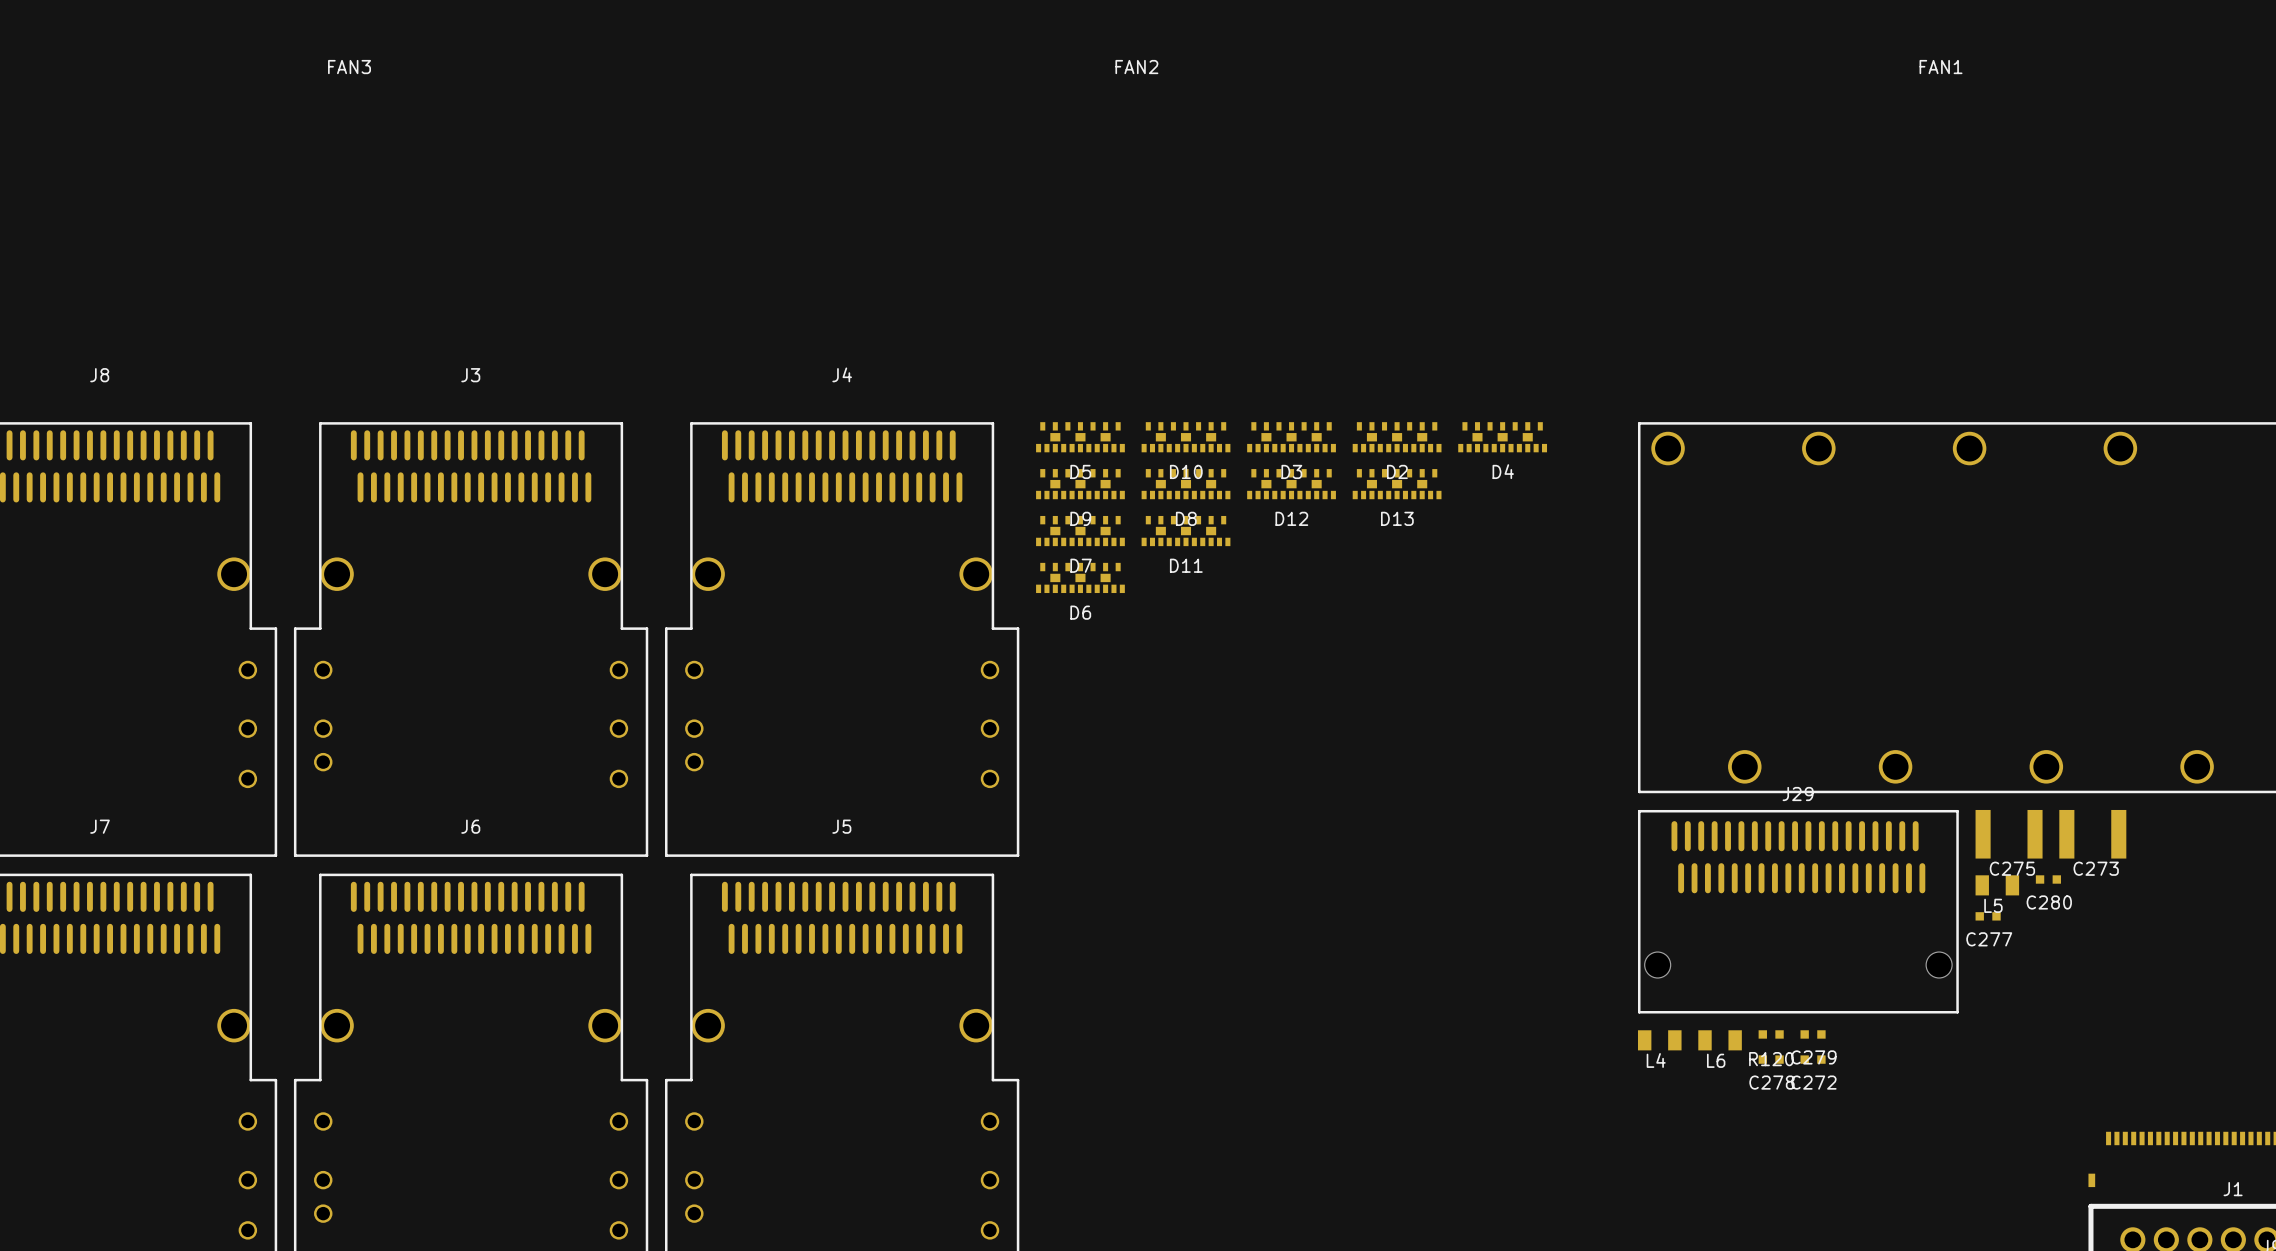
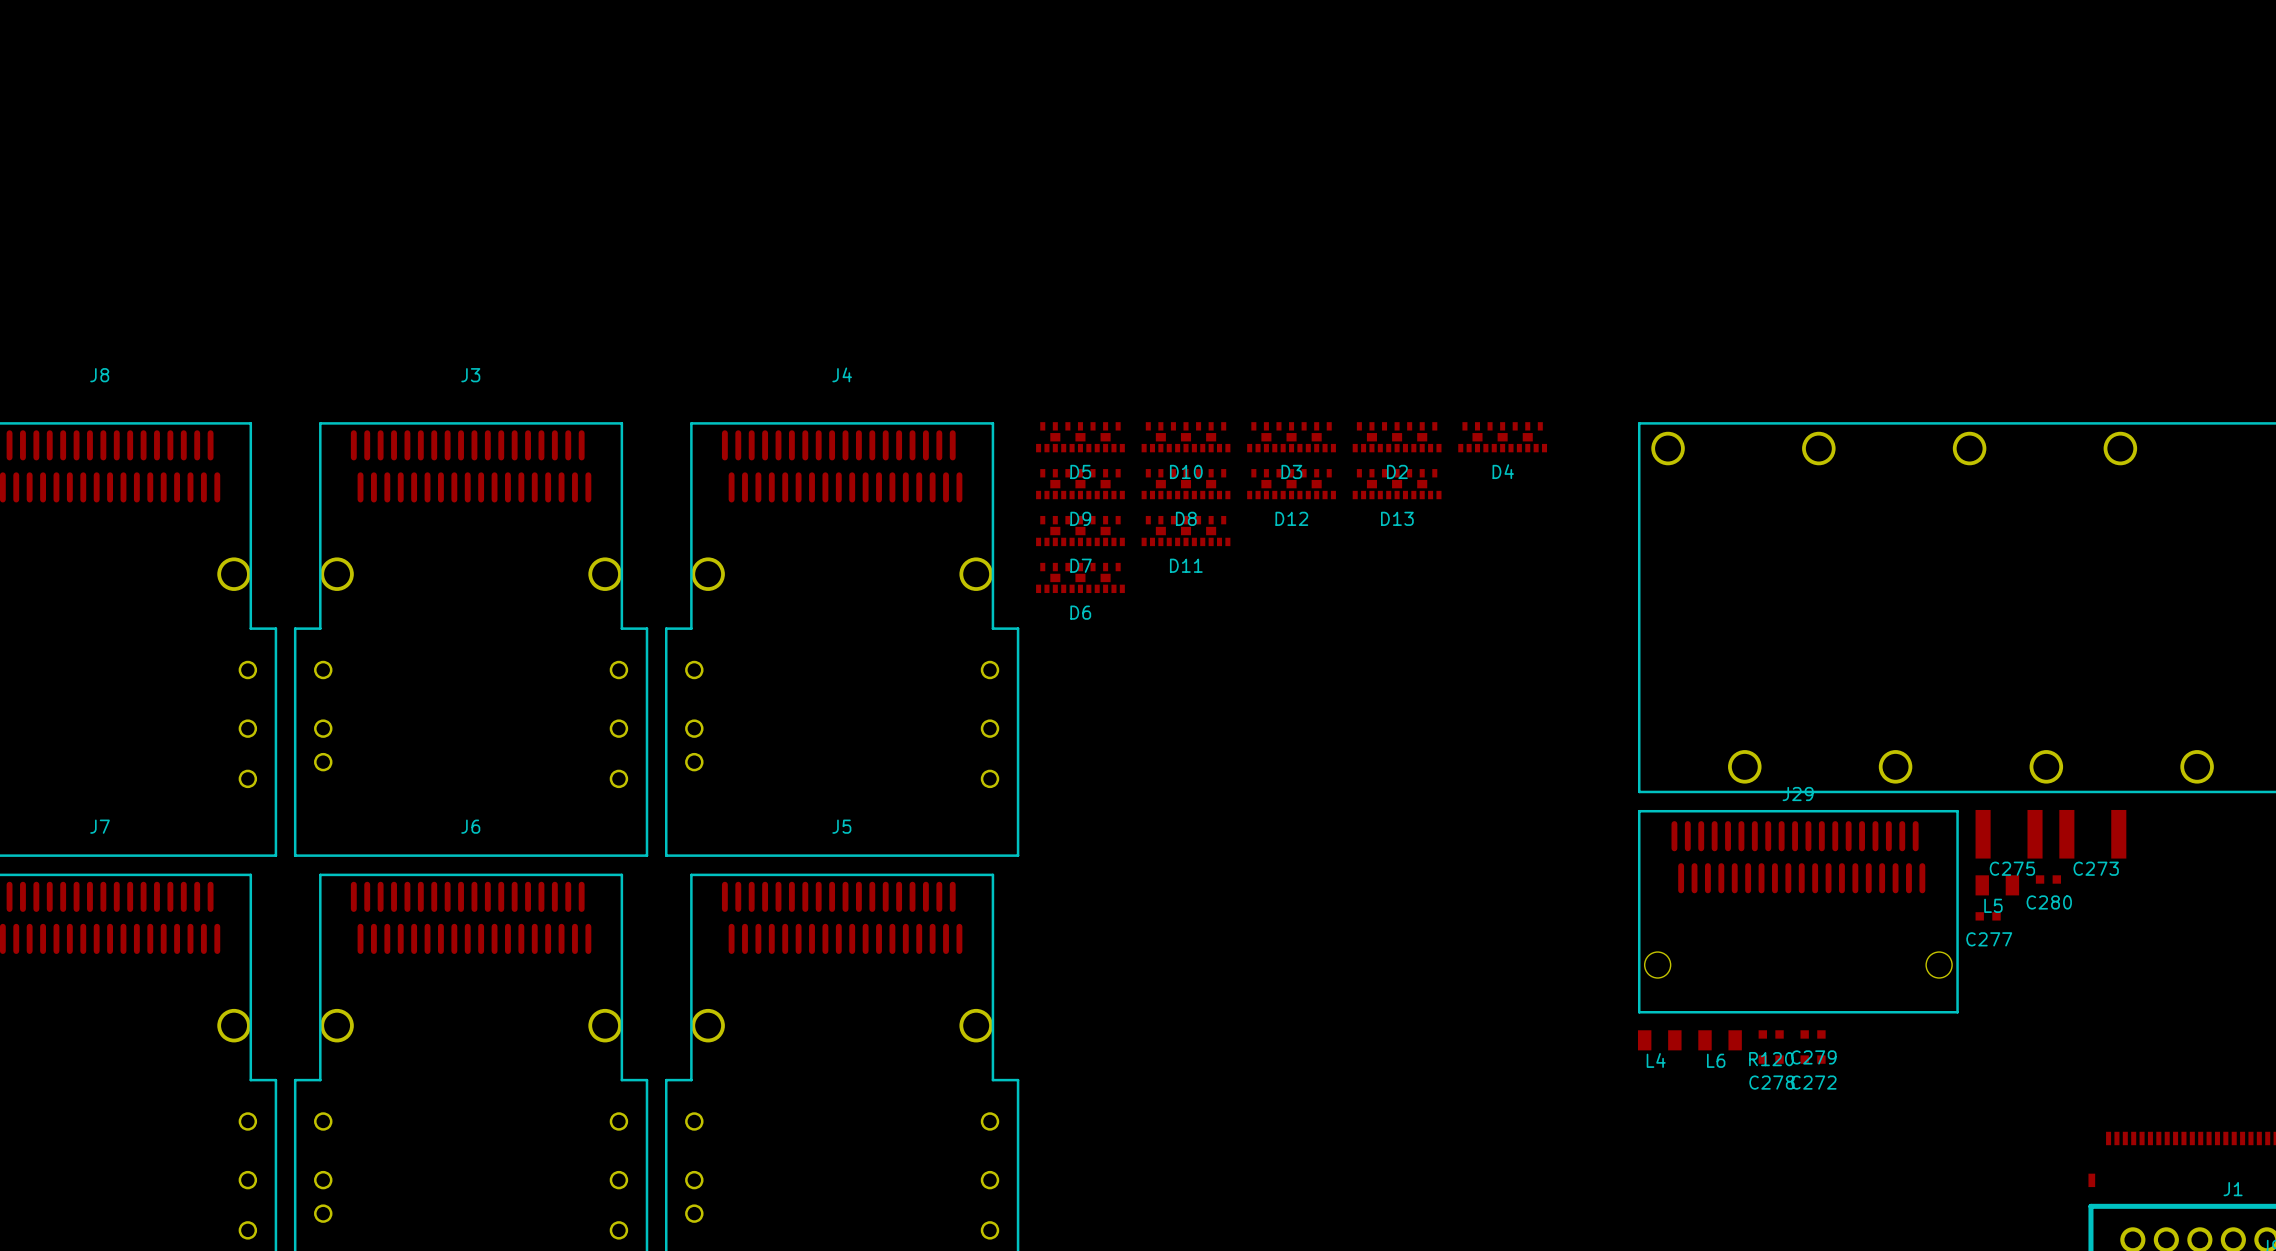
FAN3: (349, 67) -> none
FAN2: (1136, 67) -> none
FAN1: (1941, 67) -> none

